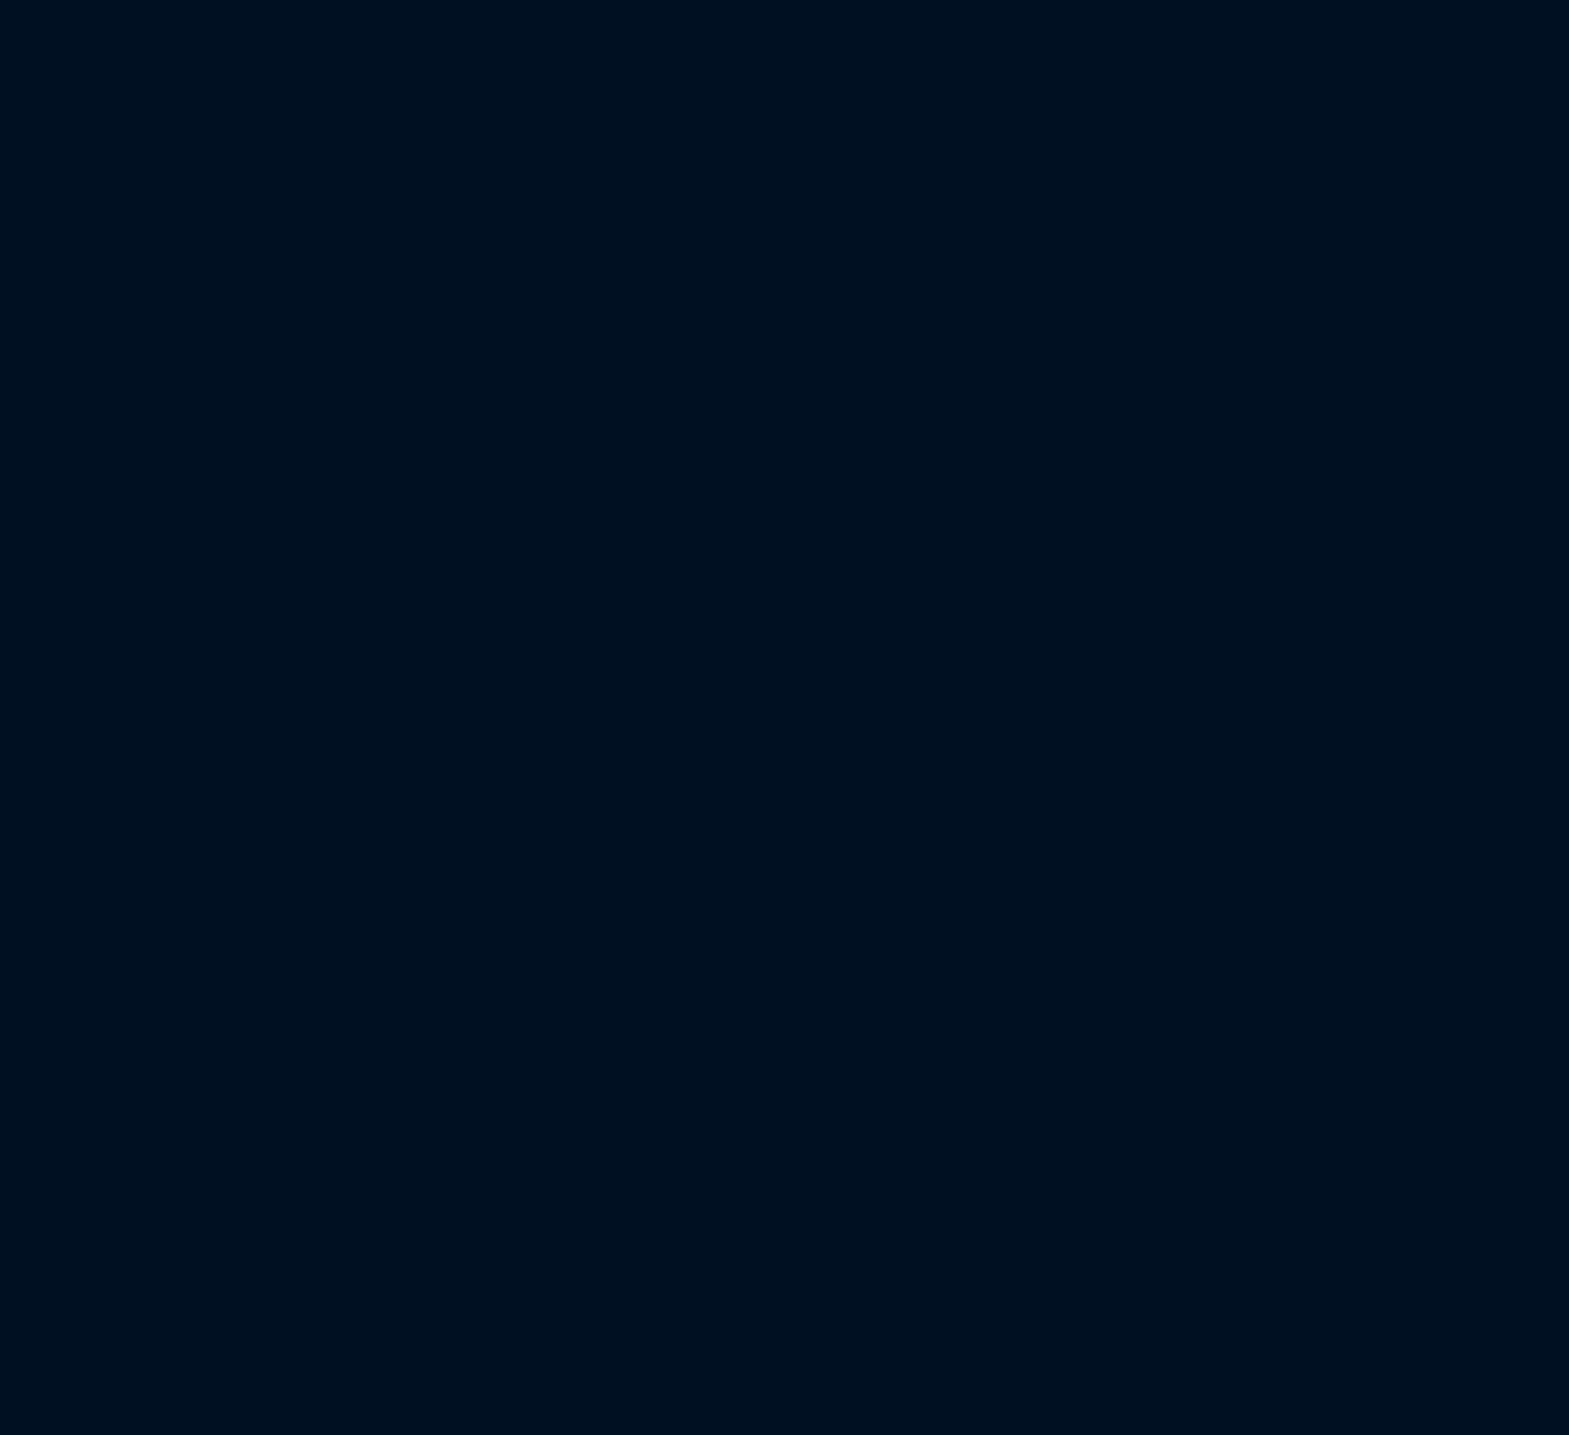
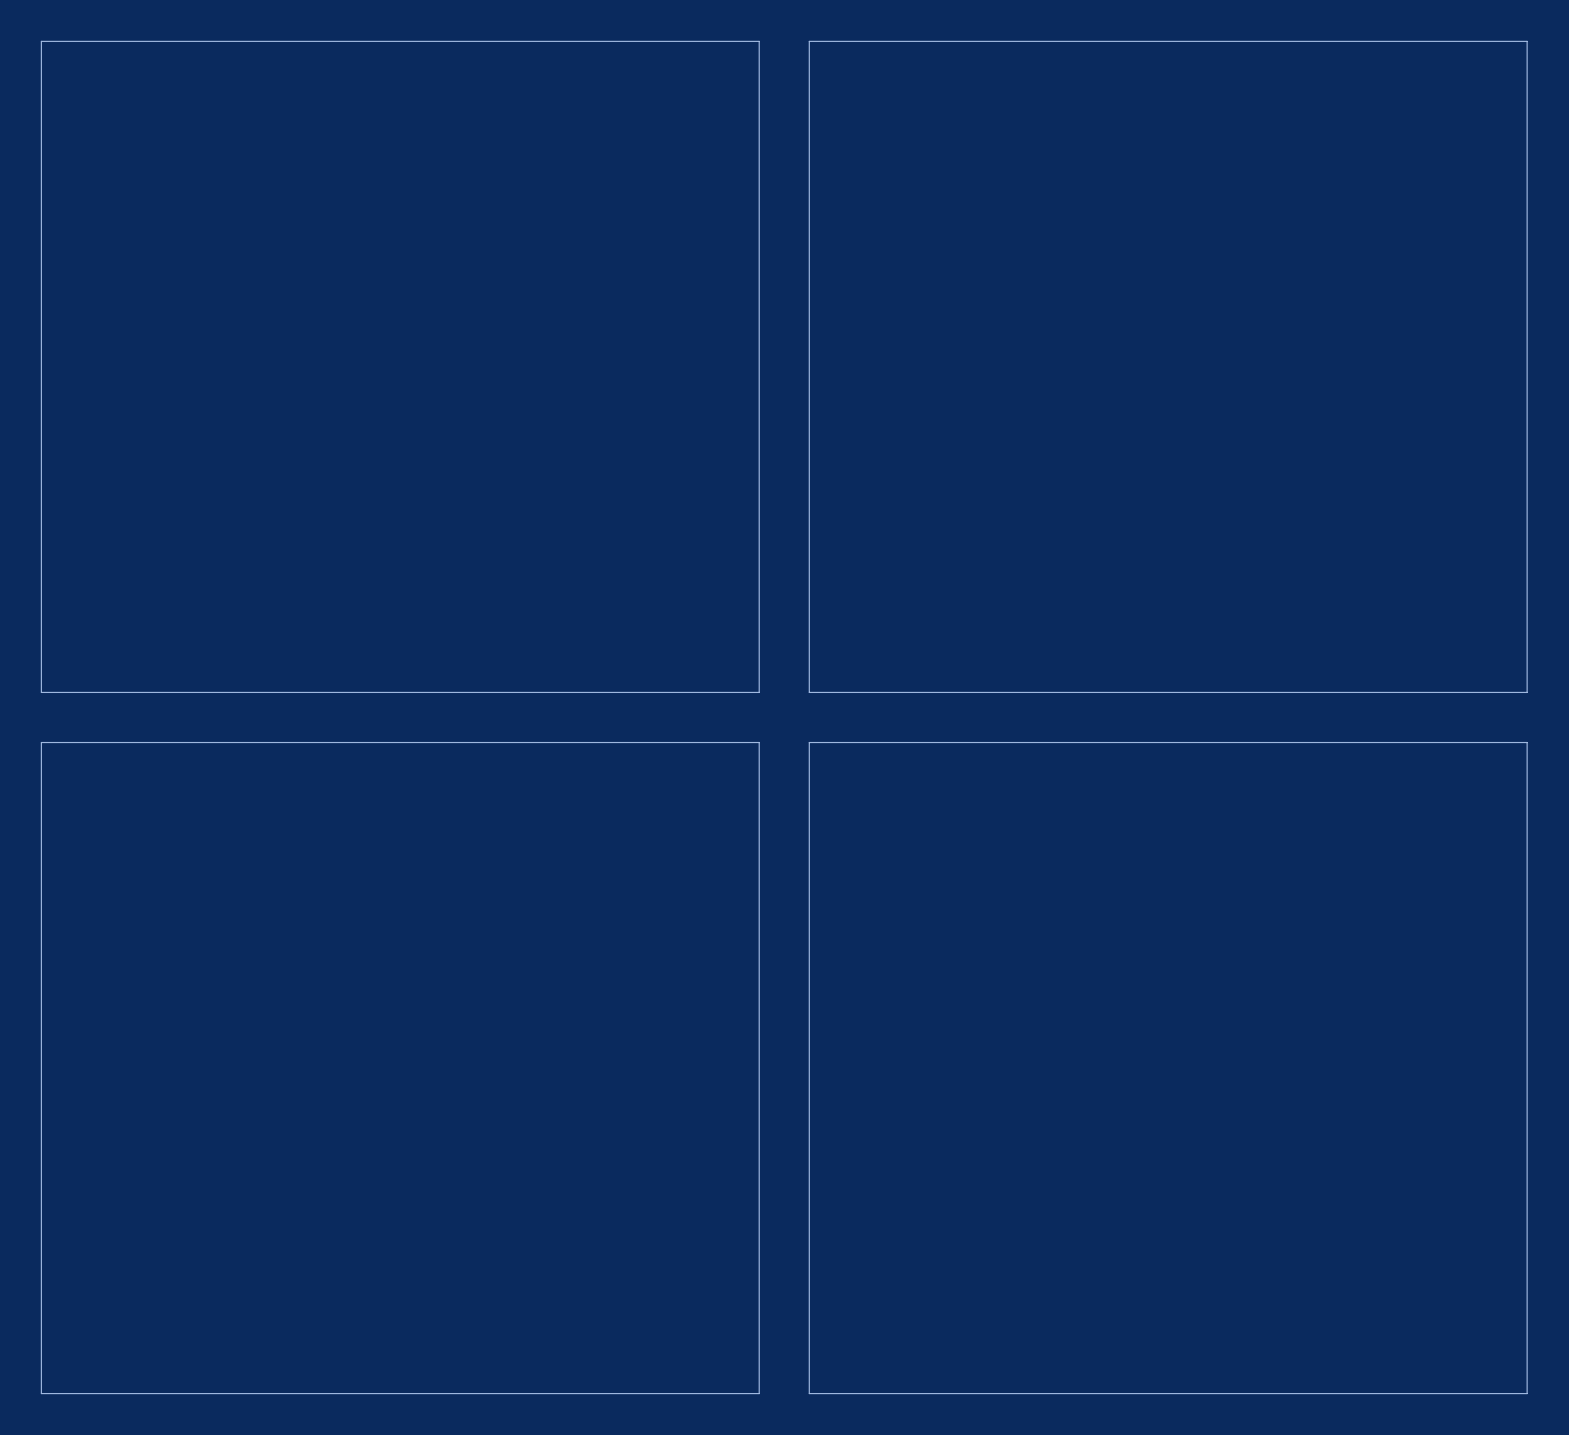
line: none -> (41, 41) (41, 692) (759, 692) (759, 41) (41, 41)
line: none -> (809, 41) (809, 692) (1527, 692) (1527, 41) (809, 41)
line: none -> (41, 742) (759, 742) (759, 1393) (41, 1393) (41, 742)
line: none -> (809, 742) (809, 1393) (1527, 1393) (1527, 742) (809, 742)

